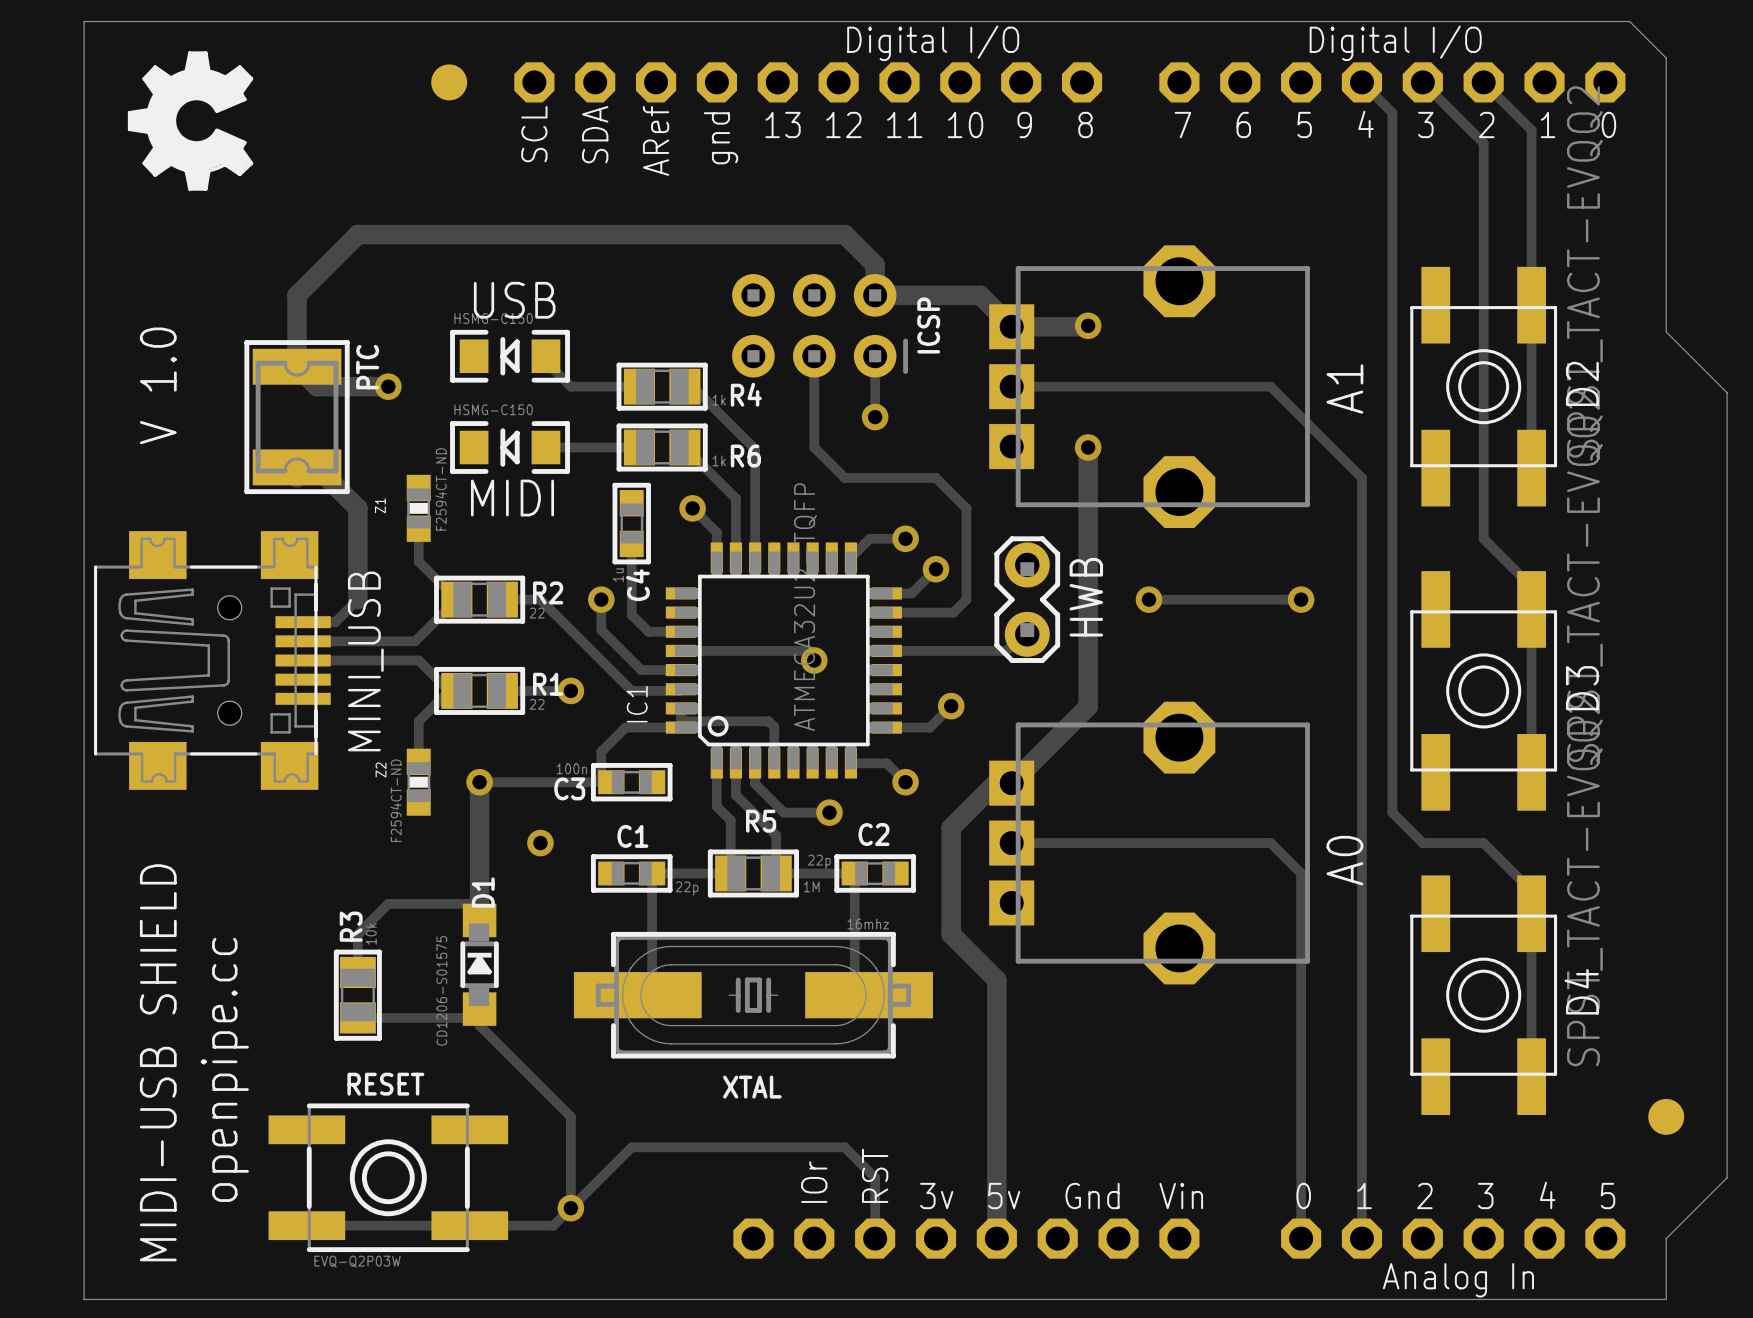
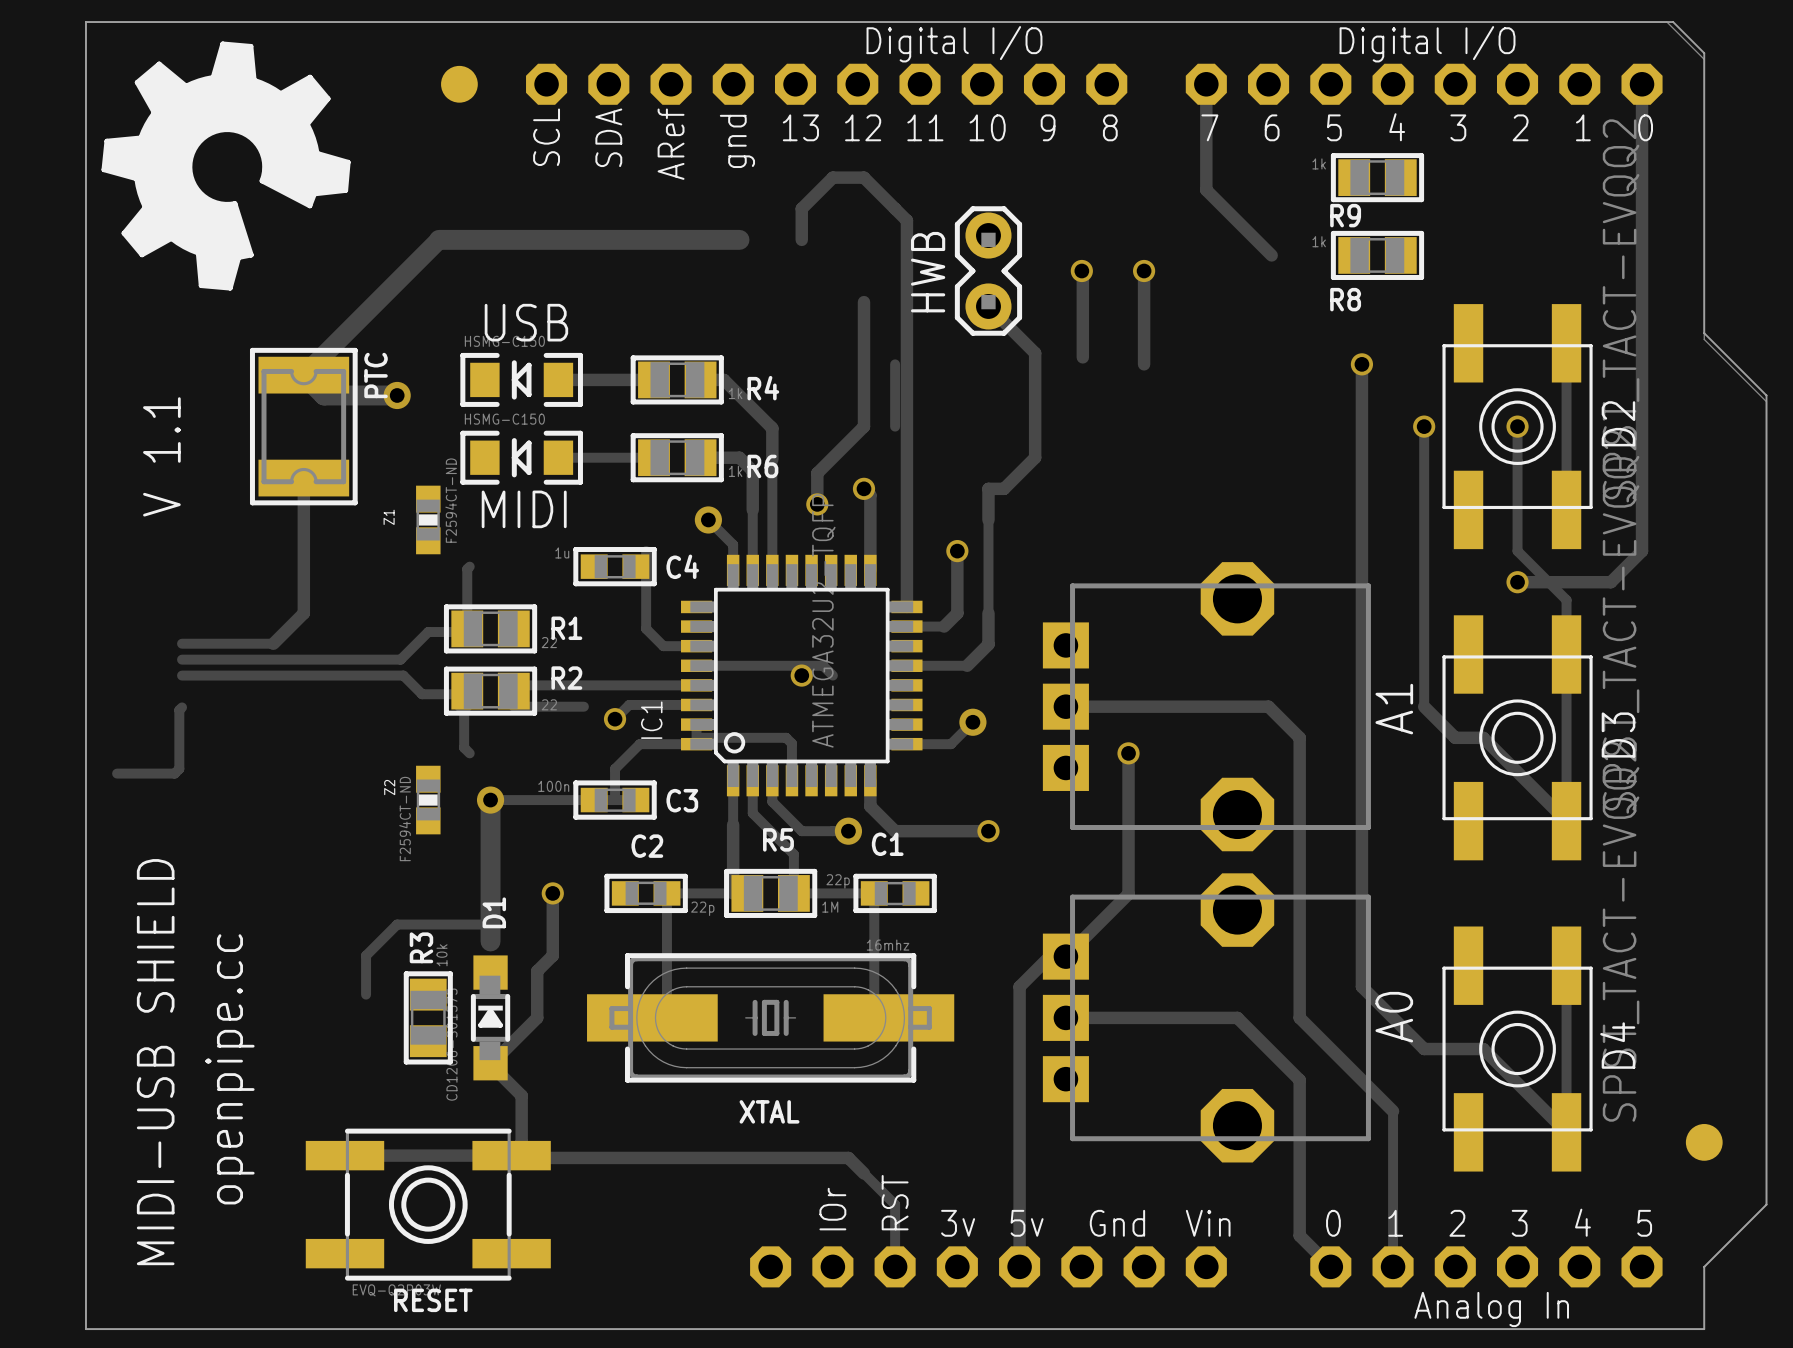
board edge: none -> (85, 22) (85, 1329) (1704, 1329) (1704, 1266) (1766, 1204) (1766, 395) (1704, 333) (1704, 53) (1673, 22) (85, 22)
drawing: none -> [101, 41, 351, 291]
drawing: [127, 51, 254, 191] -> none
track: none -> (1206, 84) (1206, 190) (1271, 255)
track: (1361, 82) (1392, 112) (1392, 417) -> none
track: (1422, 82) (1483, 143) (1483, 417) -> none
track: (1483, 82) (1531, 130) (1531, 335) -> none
track: none -> (1642, 84) (1642, 551) (1610, 582) (1517, 582)
R9: none -> 1k (1377, 177)
track: (429, 234) (357, 234) (297, 295) (297, 366) -> (439, 239) (303, 375)
track: (723, 234) (844, 234) (875, 264) (875, 295) (980, 295) (1011, 326) (1088, 325) -> none
R8: none -> 1k (1377, 255)
track: none -> (1081, 271) (1082, 357)
via: none -> (1081, 271)
track: none -> (1144, 271) (1144, 364)
via: none -> (1144, 271)
track: none -> (864, 302) (864, 426) (817, 473) (817, 504)
ICSP: (820, 325) -> none
via: (1088, 325) -> none
USB position: (510, 356) -> (521, 379)
track: (540, 356) (570, 386) (639, 386) -> none
track: (814, 356) (814, 447) (844, 477) (936, 477) (966, 508) -> (988, 306) (1035, 353) (1035, 457) (1004, 488) (988, 488) (988, 519)
track: none -> (1361, 364) (1361, 986) (1424, 1049) (1483, 1049) (1566, 1132) (1566, 1101)
via: none -> (1361, 364)
track: none -> (558, 379) (653, 379)
text: V 1.0 (158, 385) -> V 1.1 (161, 456)
R4 position: (662, 386) -> (677, 379)
track: (692, 386) (755, 449) -> (700, 379) (723, 379) (772, 428) (772, 459)
track: (1011, 386) (1270, 386) (1361, 477) (1361, 1086) -> (1065, 706) (1268, 706) (1299, 737) (1299, 1017) (1393, 1111)
part: (1149, 386) -> none
D2 position: (1483, 386) -> (1517, 426)
text position: A1 (1344, 389) -> A1 (1394, 709)
via: (875, 417) -> none
via: none -> (1424, 426)
via: none -> (1517, 426)
track: (684, 447) (735, 498) -> (700, 457) (739, 457) (752, 470) (752, 509)
track: (1088, 447) (1088, 706) (1011, 783) (995, 783) (951, 827) (951, 934) (996, 979) -> (1128, 753) (1128, 894) (1065, 956) (1050, 955) (1019, 986) (1019, 1002)
via: (1088, 447) -> none
track: (297, 477) (327, 477) (357, 508) (357, 599) (335, 622) (303, 622) -> (303, 488) (303, 613) (273, 643)
via: none -> (864, 488)
via: none -> (817, 504)
C4 rotation: 0° (631, 523) -> 90° clockwise (615, 566)
track: (418, 538) (418, 561) (456, 599) (415, 641) (303, 641) -> none
track: (905, 538) (869, 538) (850, 557) -> (864, 488) (870, 495) (870, 570)
via: (905, 538) -> none
track: none -> (957, 551) (957, 613) (944, 626)
via: none -> (957, 551)
track: none -> (469, 566) (467, 569) (467, 628) (464, 632) (428, 632) (400, 659) (182, 659)
track: (936, 569) (911, 593) (886, 593) -> (801, 239) (801, 208) (832, 177) (864, 177) (906, 220) (906, 606)
via: (936, 569) -> none
via: none -> (1517, 582)
C4 name position: C4 (637, 585) -> C4 (682, 566)
R2 name position: R2 (548, 592) -> R2 (566, 678)
HWB name position: HWB (1086, 597) -> HWB (928, 272)
R2 position: (479, 599) -> (490, 691)
track: (502, 599) (540, 599) (631, 690) (679, 690) (681, 689) -> (615, 719) (629, 704) (696, 704)
track: (601, 599) (601, 630) (641, 670) -> (513, 691) (519, 685) (655, 685)
via: (601, 599) -> none
track: (966, 599) (953, 612) (923, 612) -> (988, 613) (988, 644) (967, 665)
HWB position: (1027, 599) -> (988, 271)
track: (1148, 599) (1301, 599) -> none
via: (1148, 599) -> none
via: (1301, 599) -> none
track: none -> (182, 643) (272, 644)
track: (1027, 630) (1006, 650) (945, 650) -> none
track: none -> (182, 675) (310, 675)
MINI_USB: (212, 660) -> none
track: (394, 660) (418, 660) (449, 690) (418, 721) (418, 761) -> (403, 675) (422, 694) (464, 694)
via: none -> (801, 675)
via: (814, 660) -> none
track: none -> (464, 694) (464, 747) (469, 753)
R1 name position: R1 (548, 684) -> R1 (566, 628)
R1 position: (479, 690) -> (490, 628)
via: (570, 690) -> none
part: none -> (1206, 706)
track: (1392, 690) (1392, 812) (1422, 843) (1483, 843) (1531, 890) (1531, 944) -> (1424, 706) (1455, 737) (1483, 737) (1566, 821) (1566, 790)
D3 position: (1483, 690) -> (1517, 737)
track: none -> (182, 707) (179, 710) (179, 768) (174, 773) (117, 773)
via: none -> (615, 719)
via: none -> (1128, 753)
track: (850, 763) (886, 763) (905, 782) -> (870, 780) (870, 806) (895, 831) (988, 831)
C3 position: (631, 782) -> (615, 800)
via: (905, 782) -> none
C3 name position: C3 (569, 788) -> C3 (682, 800)
track: (716, 806) (730, 820) (730, 873) -> (733, 824) (733, 893)
via: none -> (988, 831)
C2 name: C2 (873, 834) -> C1 (887, 844)
C1 name: C1 (632, 836) -> C2 (647, 846)
via: (540, 843) -> none
track: (1011, 843) (1270, 843) (1301, 873) (1301, 1238) -> (1065, 1017) (1237, 1017) (1299, 1080) (1299, 1235) (1330, 1266)
part: (1149, 843) -> none
text position: A0 (1344, 860) -> A0 (1394, 1017)
track: none -> (552, 893) (552, 955) (537, 971) (537, 1017) (490, 1064) (521, 1095) (521, 1157)
via: none -> (552, 893)
D1 position: (479, 964) -> (490, 1017)
track width: thick (996, 979) (996, 1238) -> thin (1019, 1002) (1019, 1266)
R3 position: (357, 995) -> (428, 1017)
part: none -> (1206, 1017)
D4 position: (1483, 995) -> (1517, 1049)
track: (357, 1017) (476, 1017) (479, 1009) (479, 1025) (570, 1116) (570, 1208) -> none
text position: MIDI-USB SHIELD (158, 1062) -> MIDI-USB SHIELD (155, 1062)
text position: openpipe.cc (224, 1069) -> openpipe.cc (229, 1069)
RESET name position: RESET (385, 1084) -> RESET (433, 1300)
track: none -> (344, 1155) (519, 1155) (521, 1157)
track: (844, 1147) (631, 1147) (553, 1225) (306, 1225) -> (864, 1173) (848, 1157) (521, 1157)
RESET position: (388, 1177) -> (428, 1204)
via: (570, 1208) -> none

